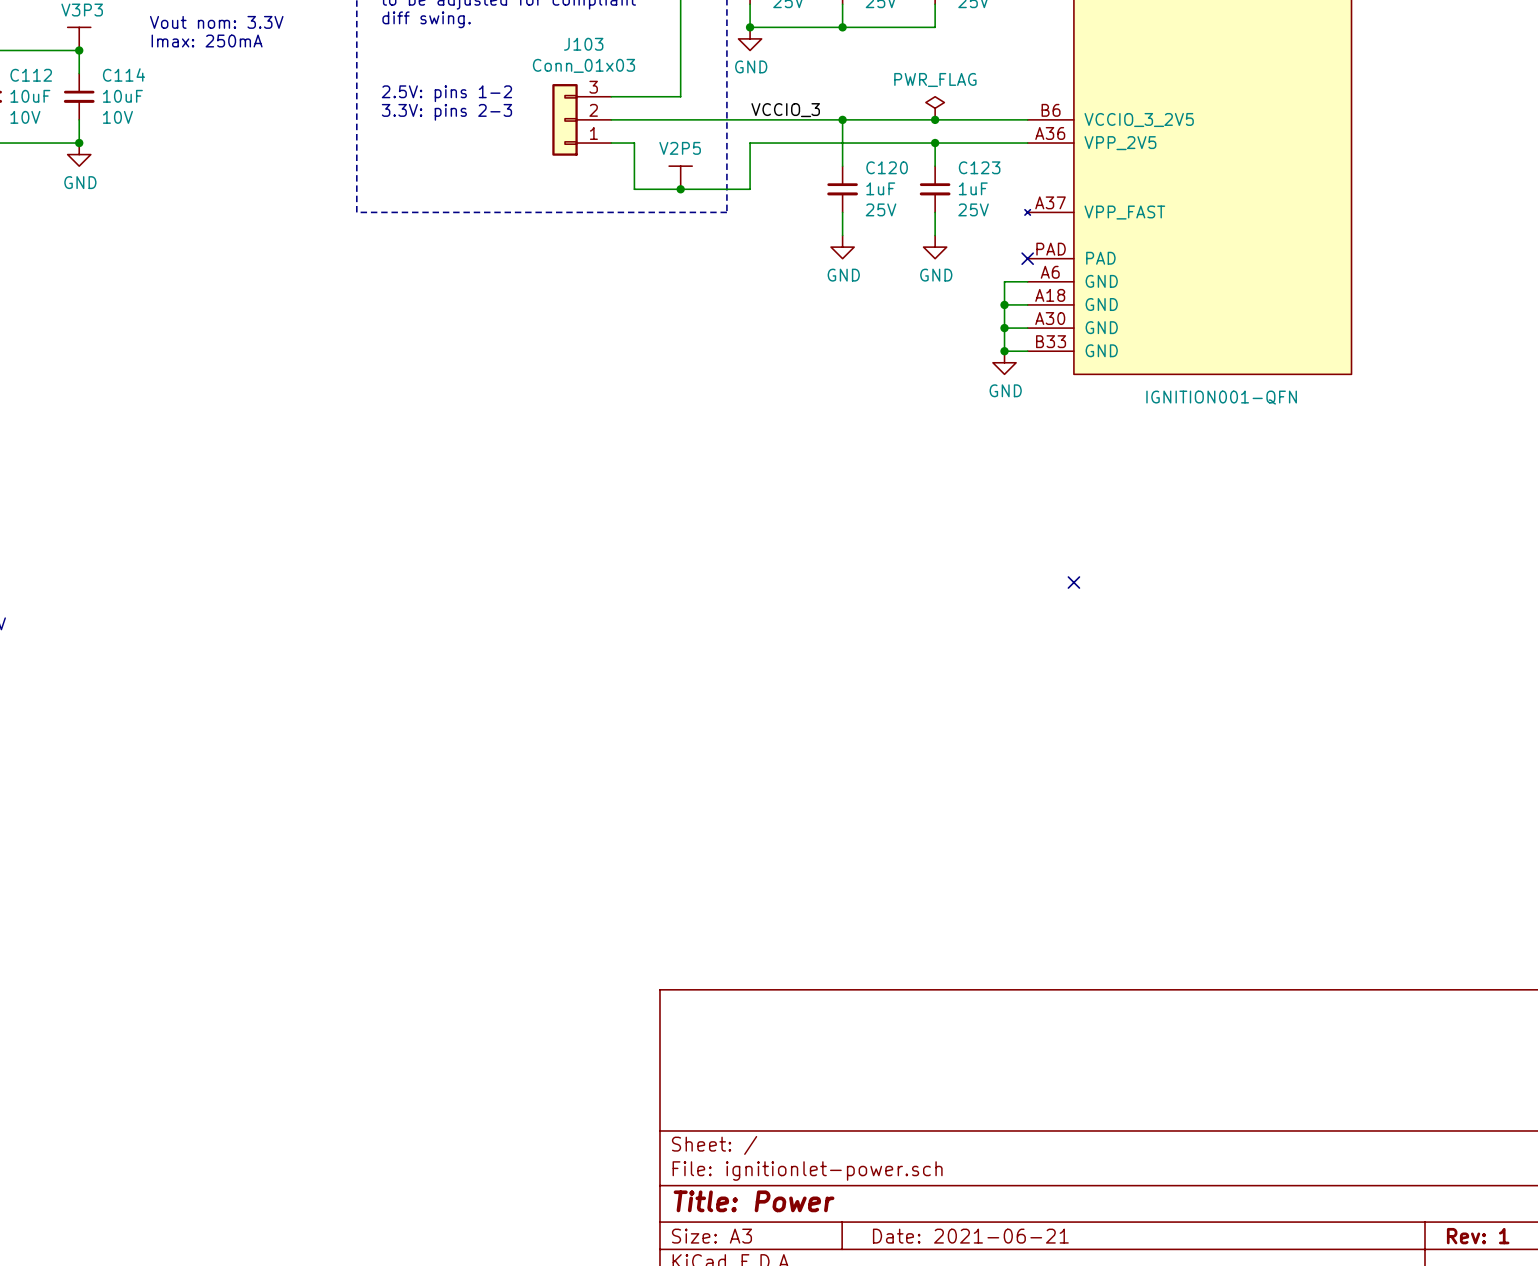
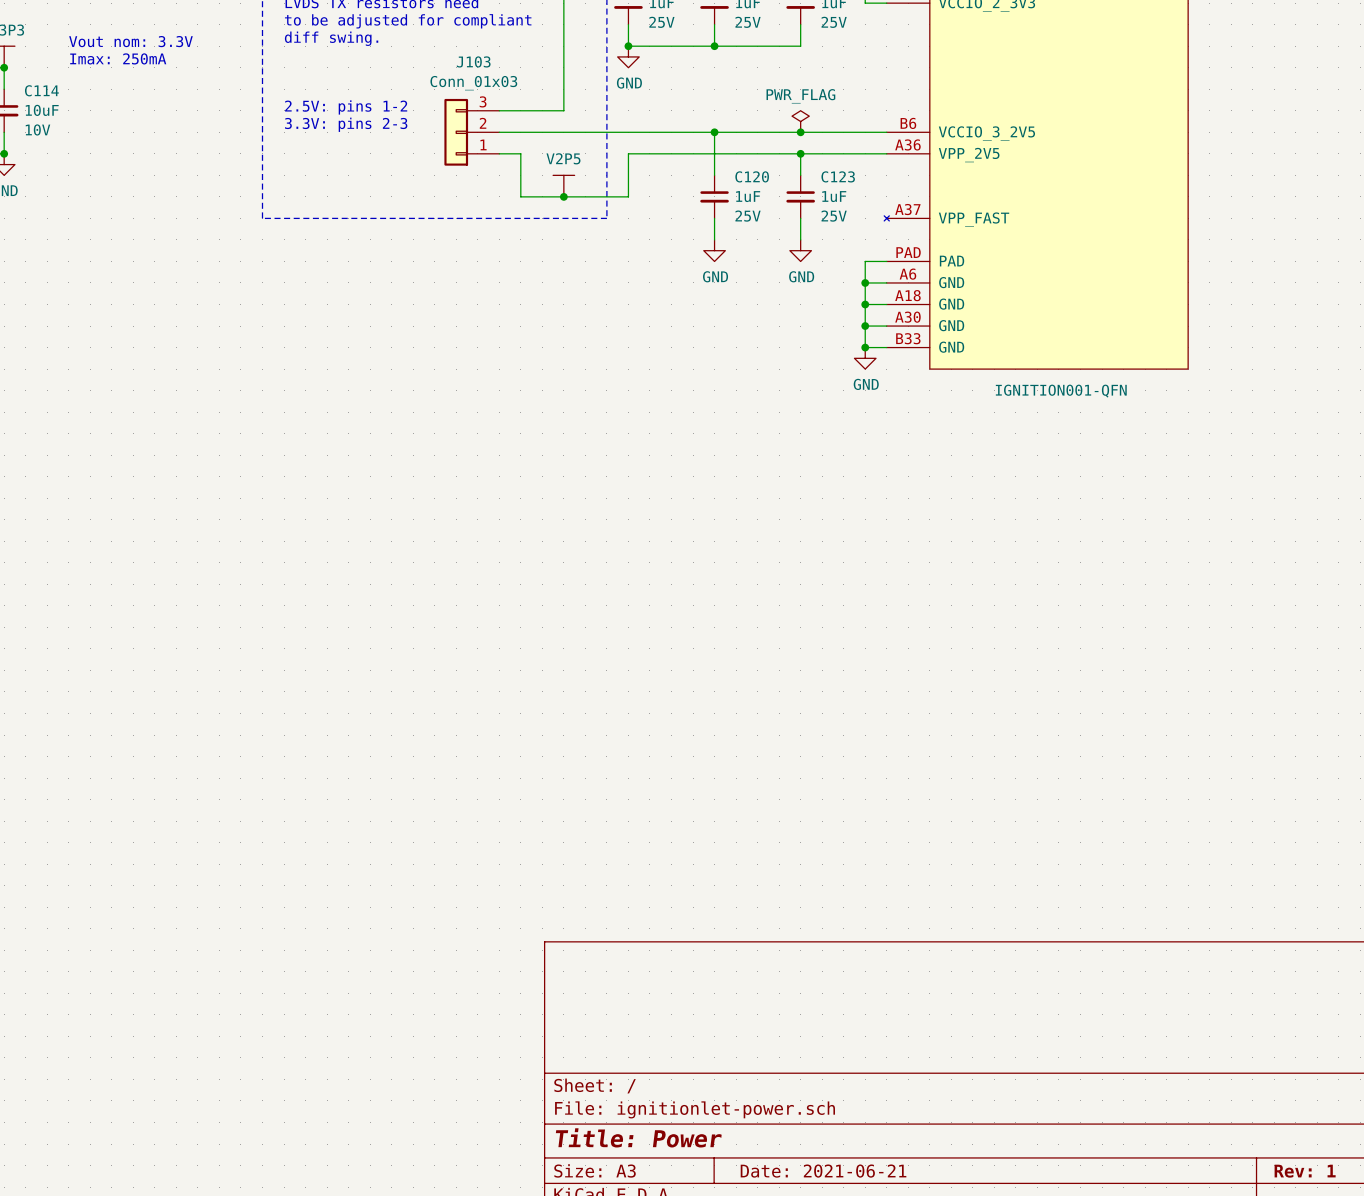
label: VCCIO_3 (785, 110) -> none
wire: none -> (886, 261) (865, 261) (865, 282)
no-connect mark: (1027, 258) -> none
junction: none -> (865, 282)
no-connect mark: (1073, 582) -> none

